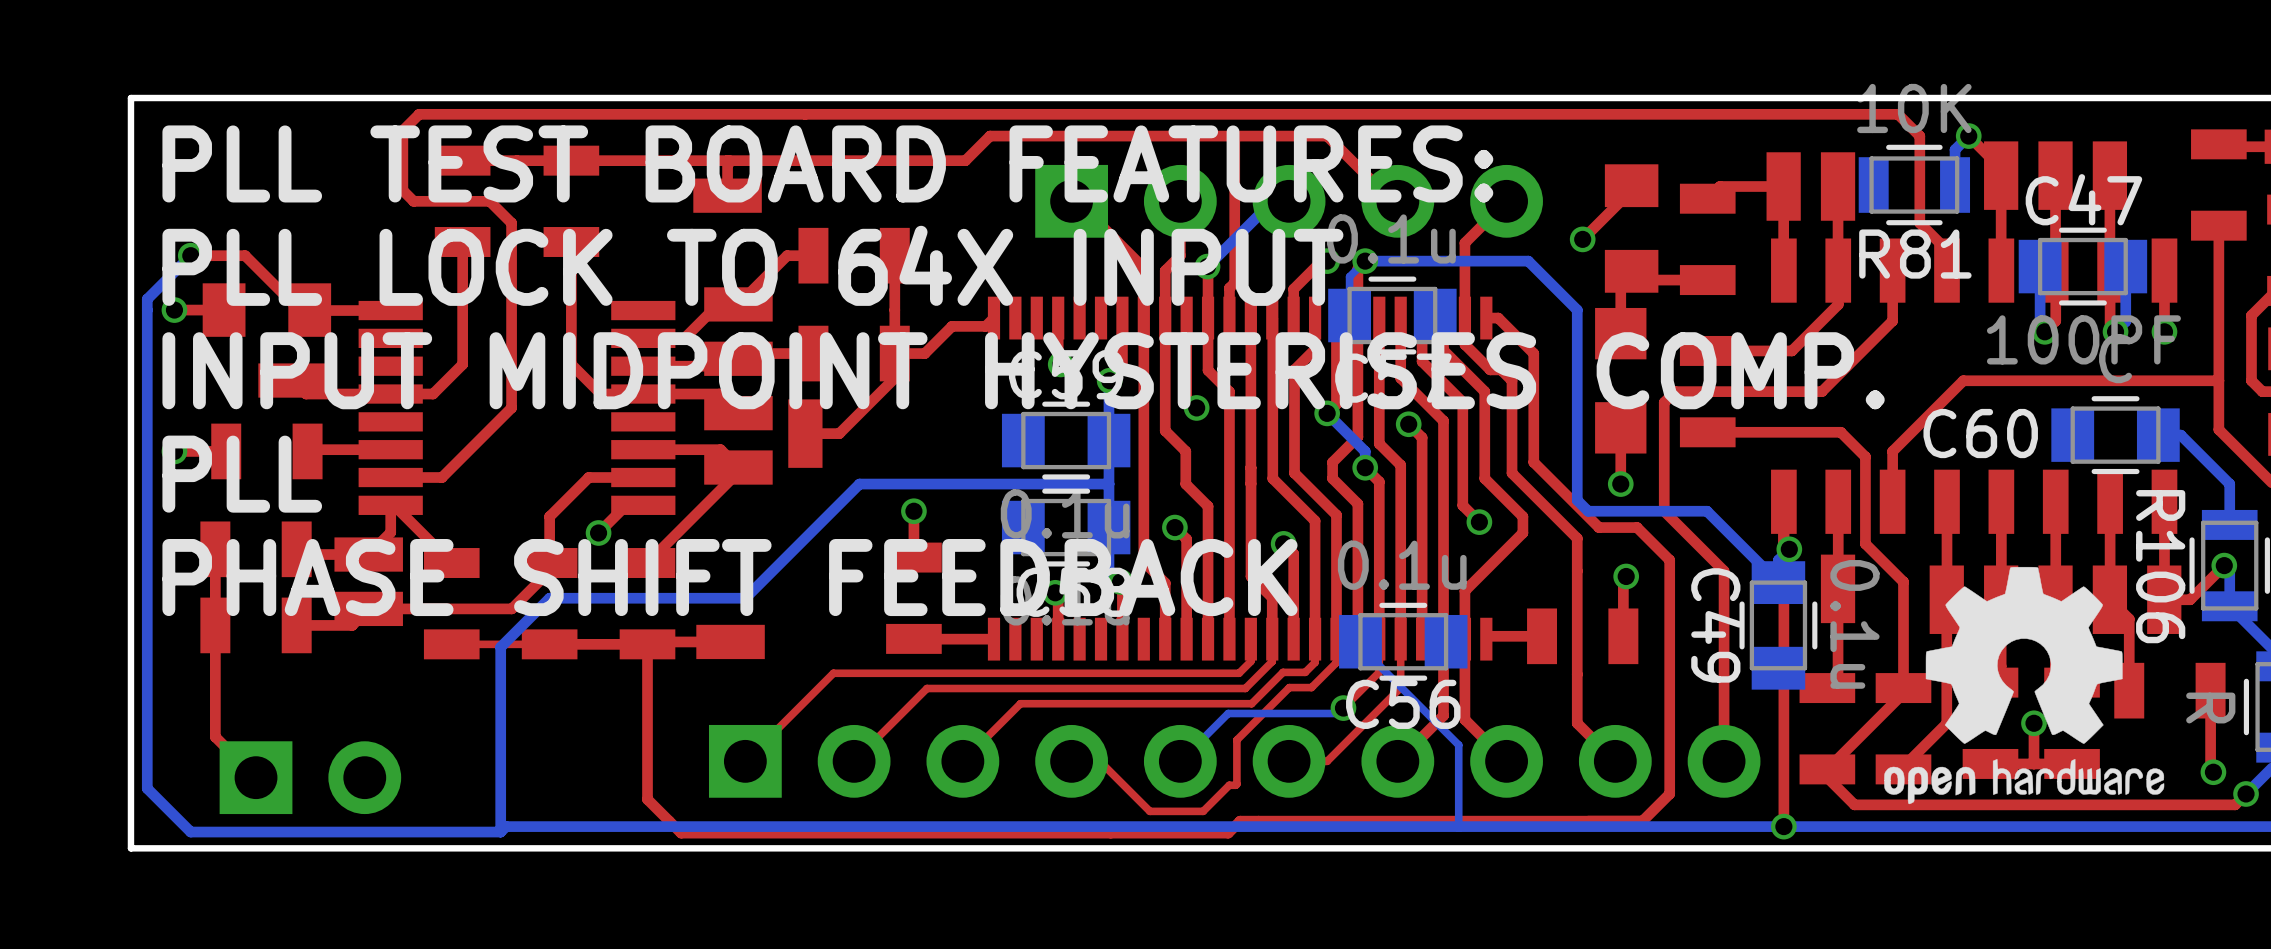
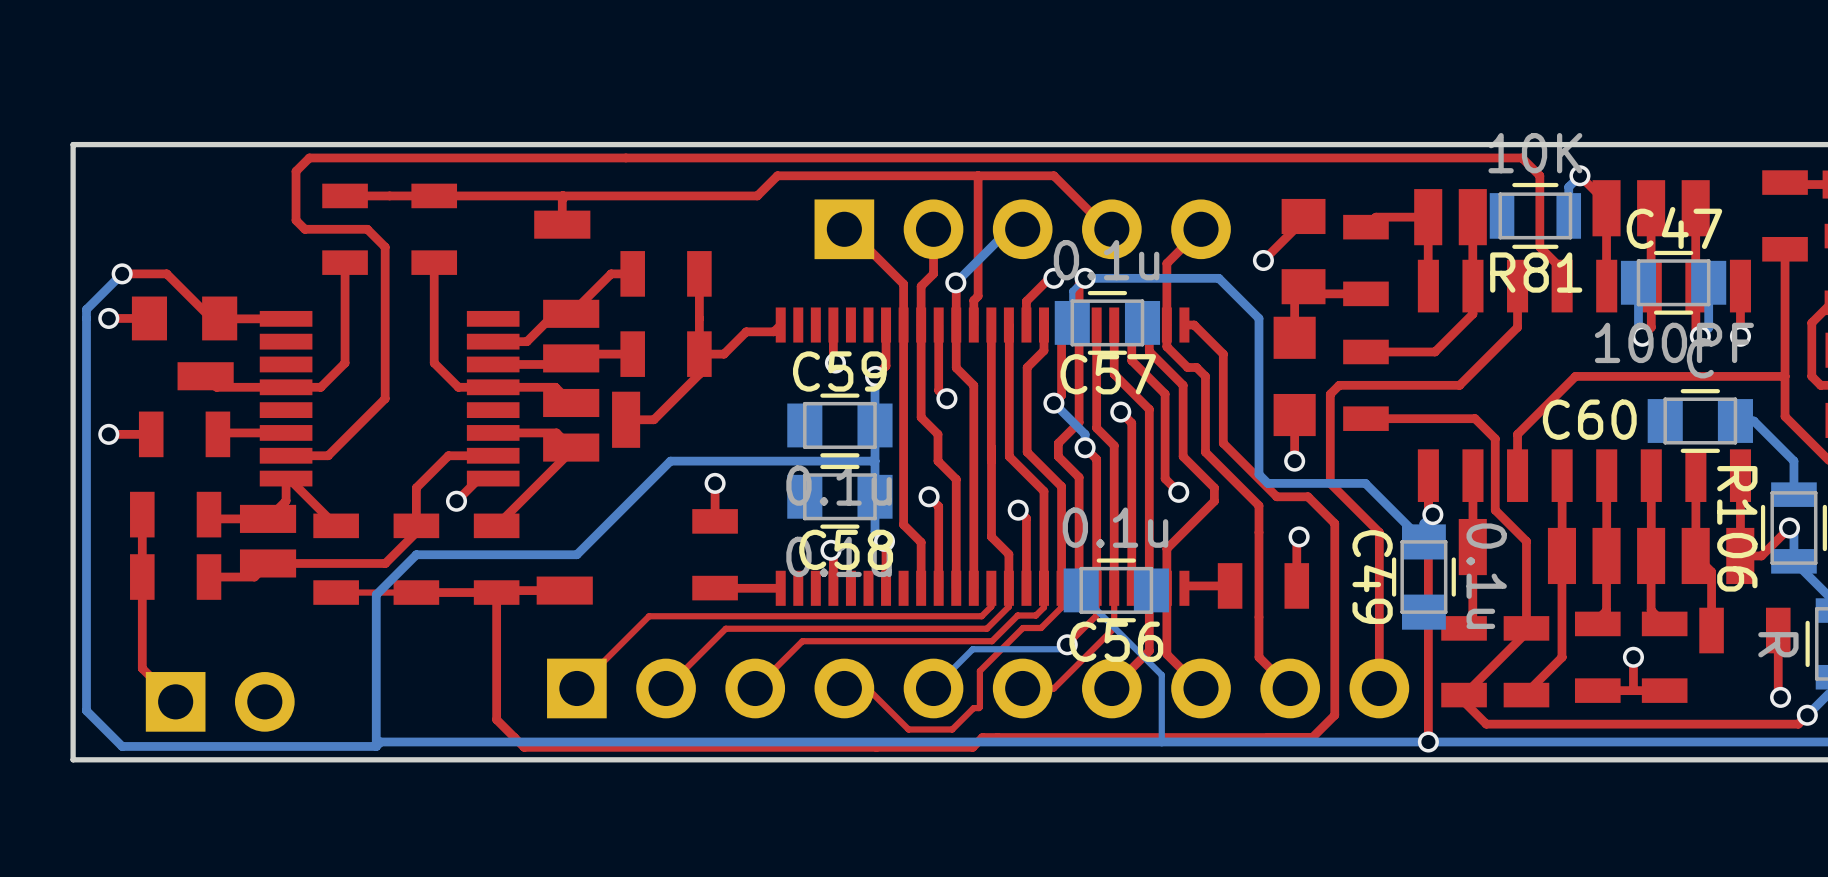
text: PLL TEST BOARD FEATURES: (827, 163) -> none
text: PLL LOCK TO 64X INPUT (752, 265) -> none
text: INPUT MIDPOINT HYSTERISES COMP. (1023, 370) -> none
text: PLL (242, 474) -> none
drawing: [1884, 566, 2165, 805] -> none
text: PHASE SHIFT FEEDBACK (729, 577) -> none

